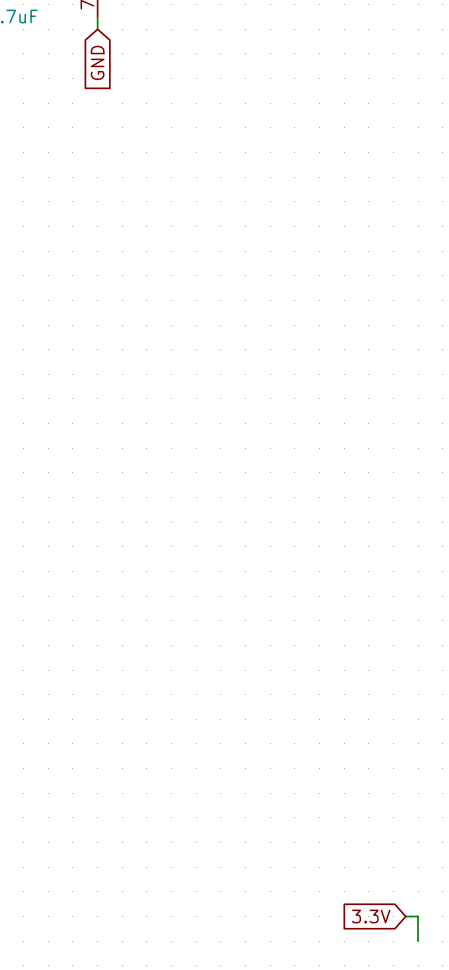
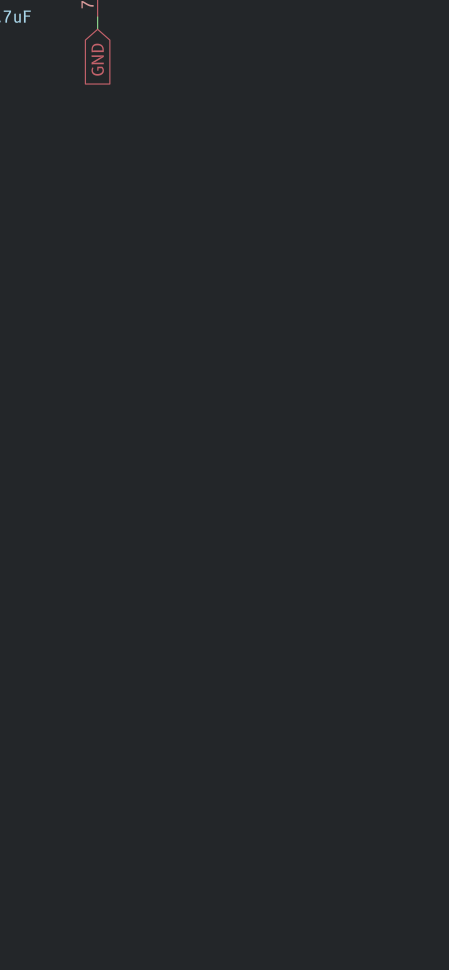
global label: 3.3V (371, 916) -> none
wire: (405, 916) (418, 916) (418, 941) -> none

